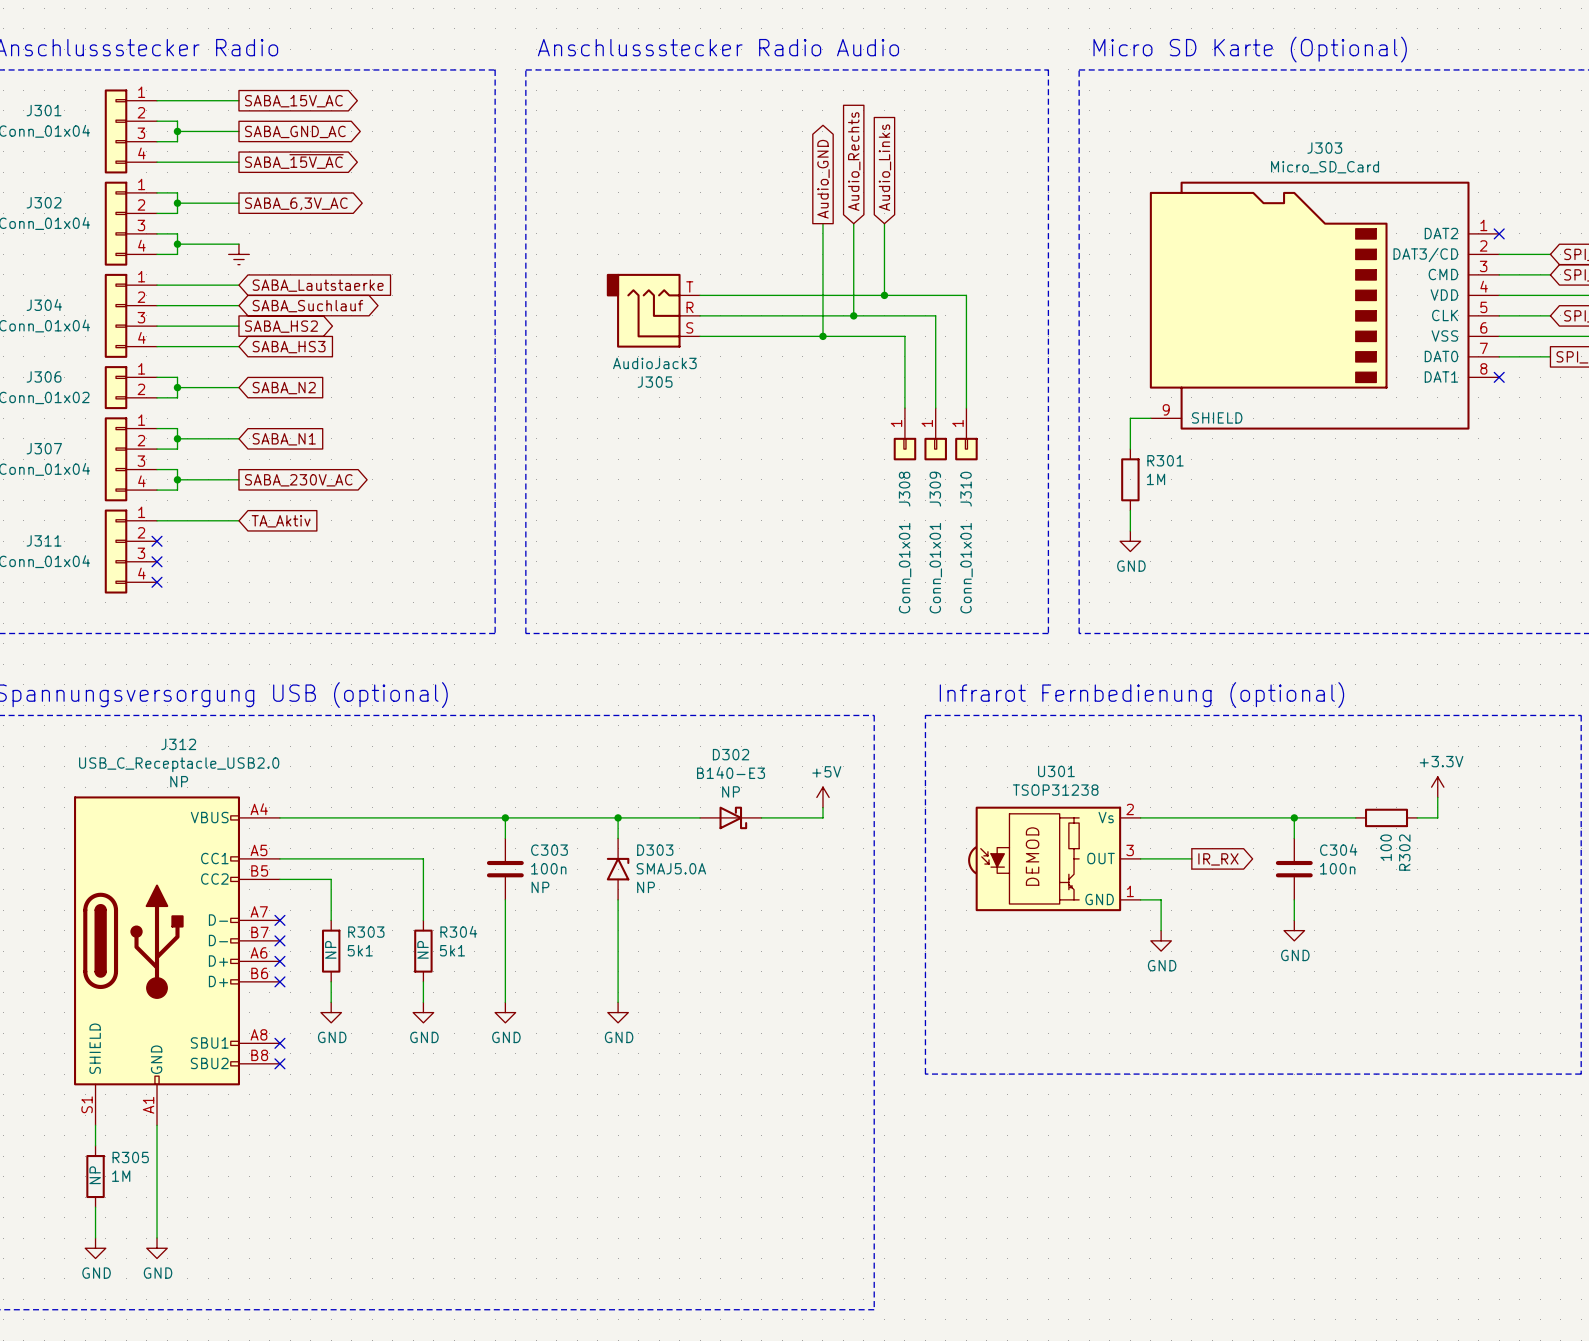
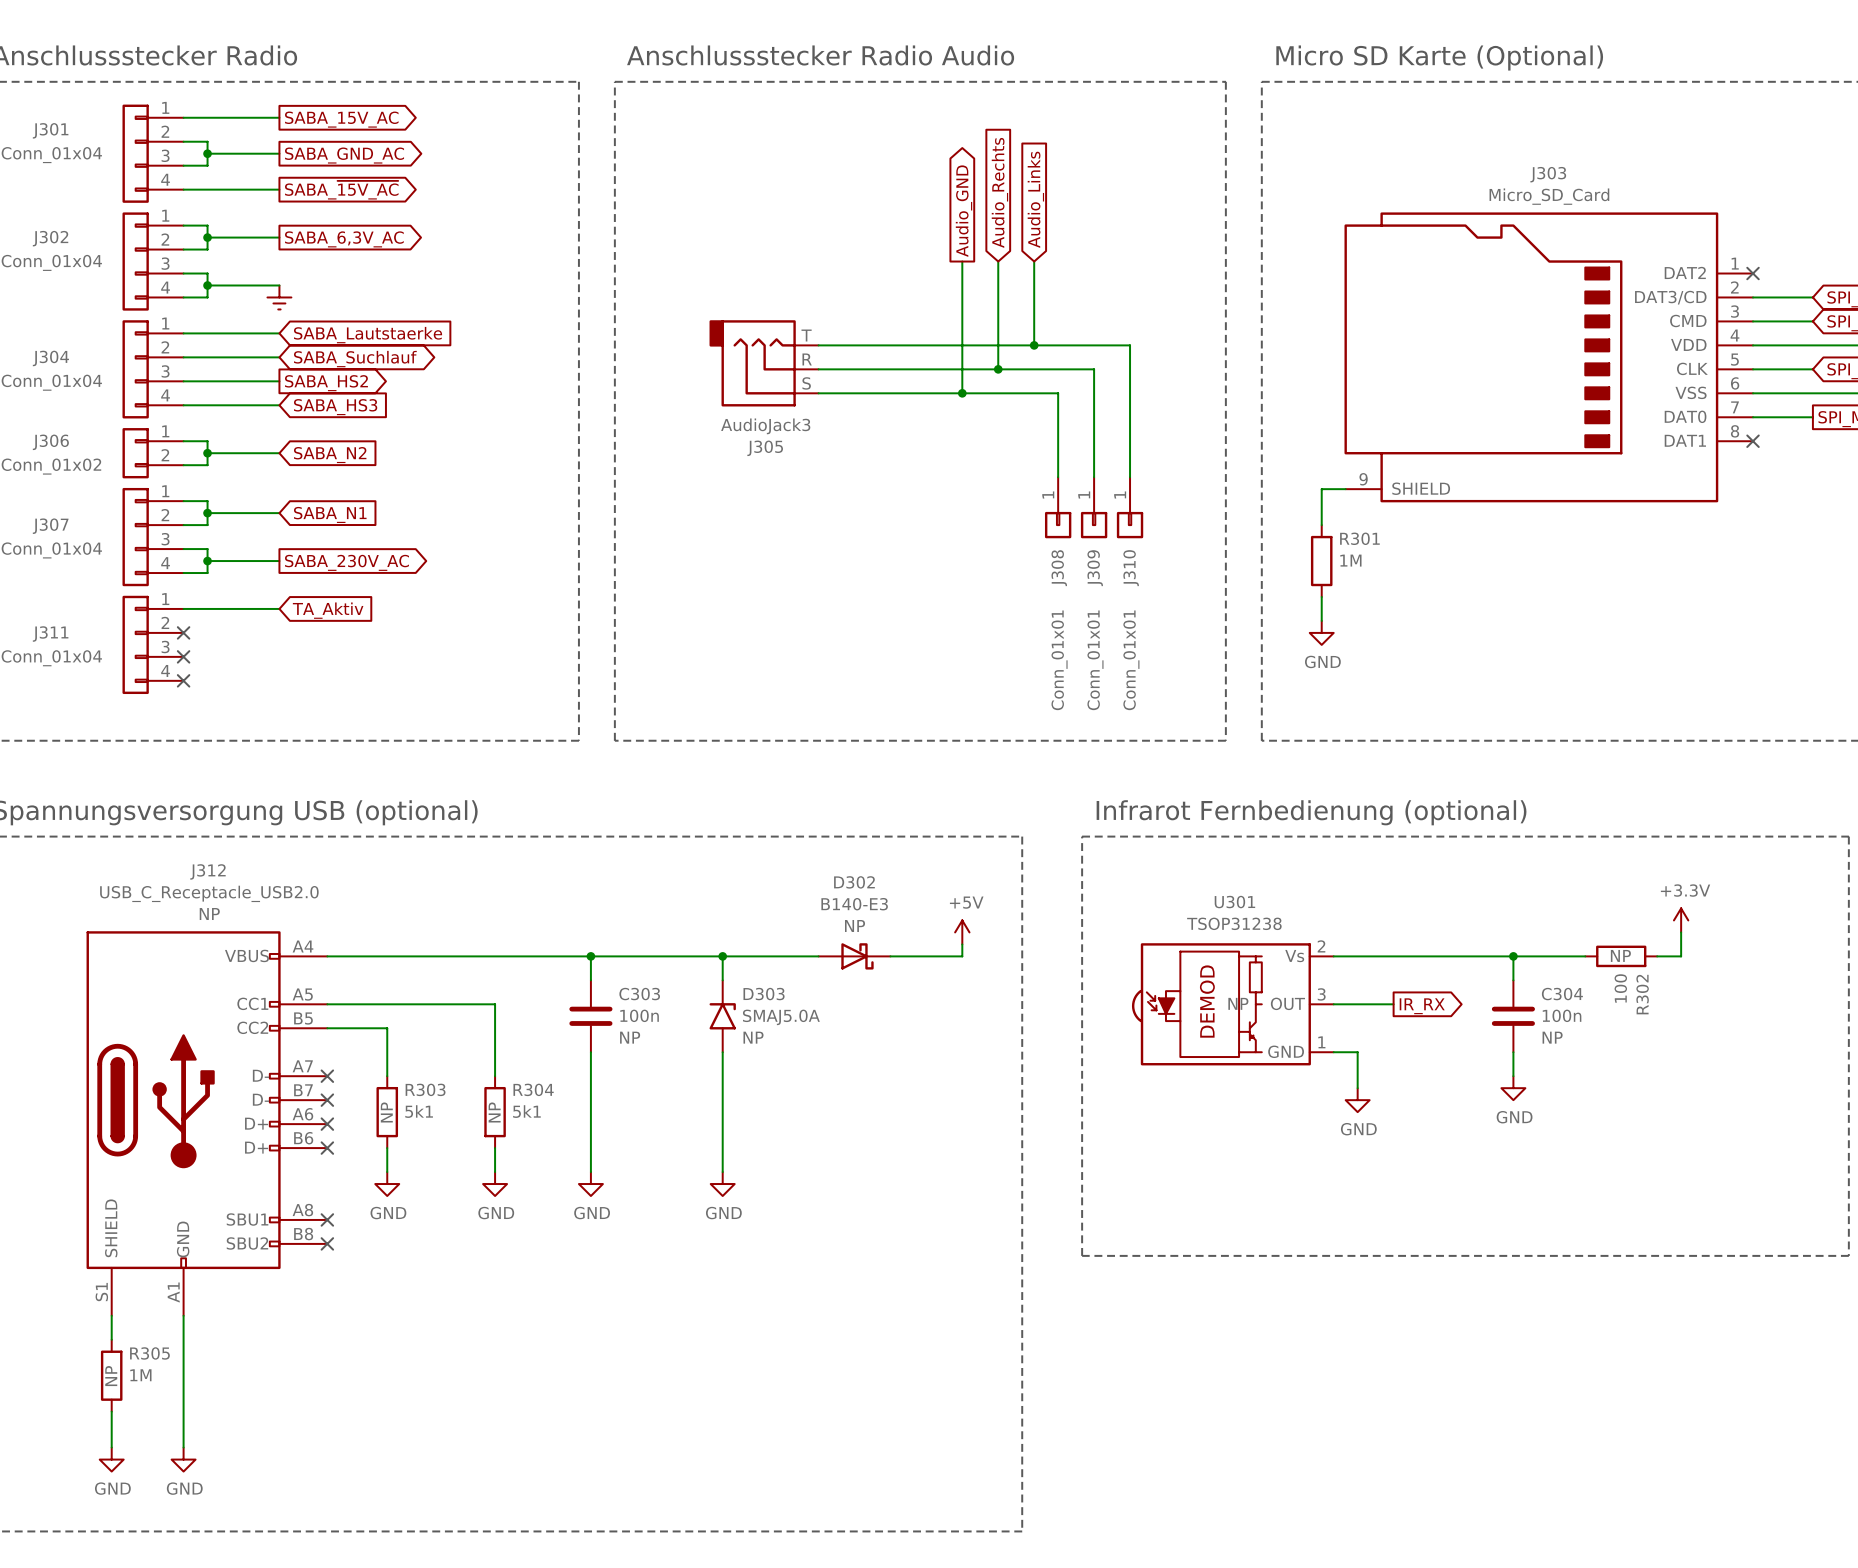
R302 text: none -> NP (1620, 955)
U301 text: none -> NP (1238, 1003)
C304 text: none -> NP (1552, 1037)

